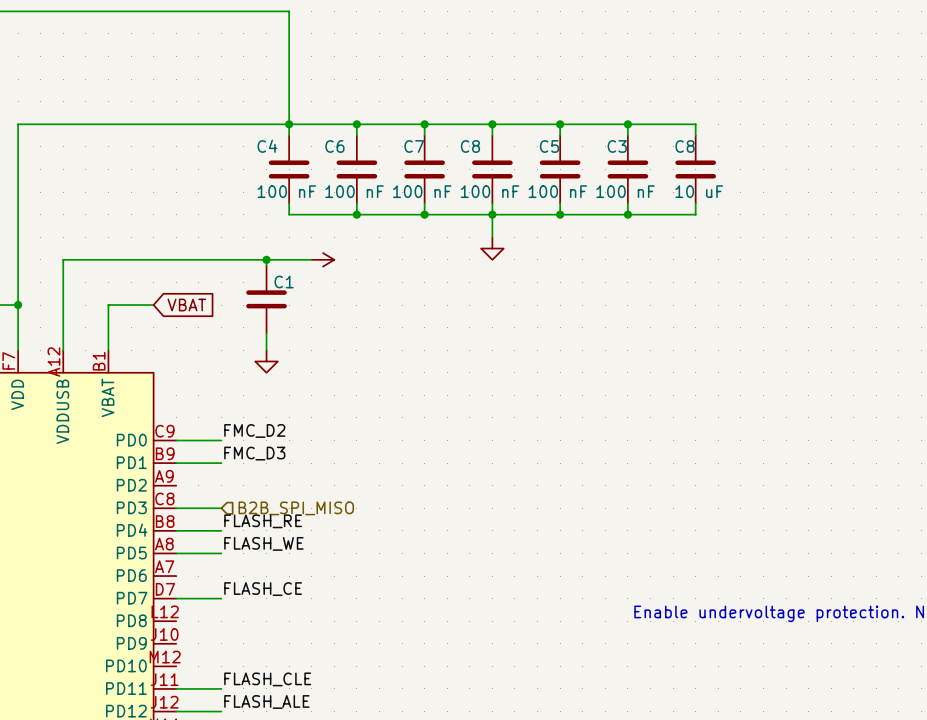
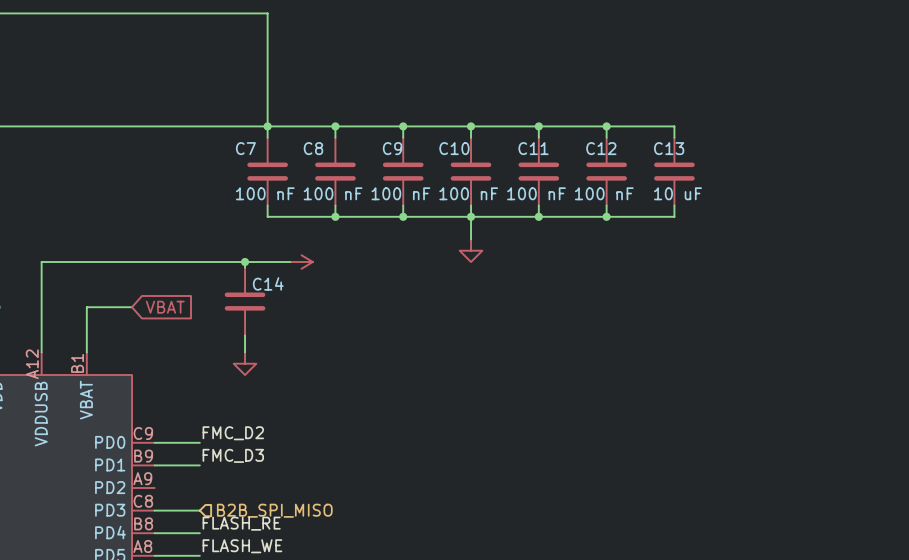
C4 name: C4 (267, 146) -> C7 (245, 148)
C6 name: C6 (334, 146) -> C8 (313, 148)
C7 name: C7 (414, 146) -> C9 (392, 148)
C8 name: C8 (470, 146) -> C10 (454, 148)
C5 name: C5 (549, 146) -> C11 (533, 148)
C3 name: C3 (617, 146) -> C12 (601, 148)
C8 name: C8 (684, 146) -> C13 (669, 148)
C1 name: C1 (284, 281) -> C14 (268, 283)

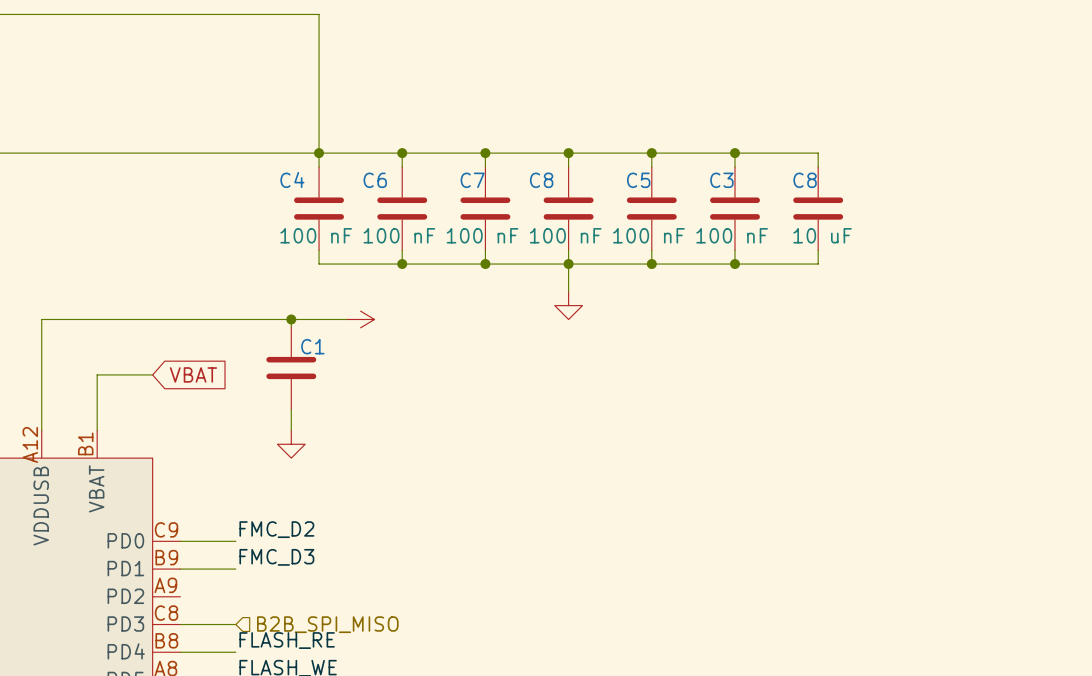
C7 name: C7 (245, 148) -> C4 (292, 179)
C8 name: C8 (313, 148) -> C6 (375, 180)
C9 name: C9 (392, 148) -> C7 (472, 180)
C10 name: C10 (454, 148) -> C8 (541, 180)
C11 name: C11 (533, 148) -> C5 (638, 180)
C12 name: C12 (601, 148) -> C3 (721, 180)
C13 name: C13 (669, 148) -> C8 (805, 180)
C14 name: C14 (268, 283) -> C1 (312, 346)

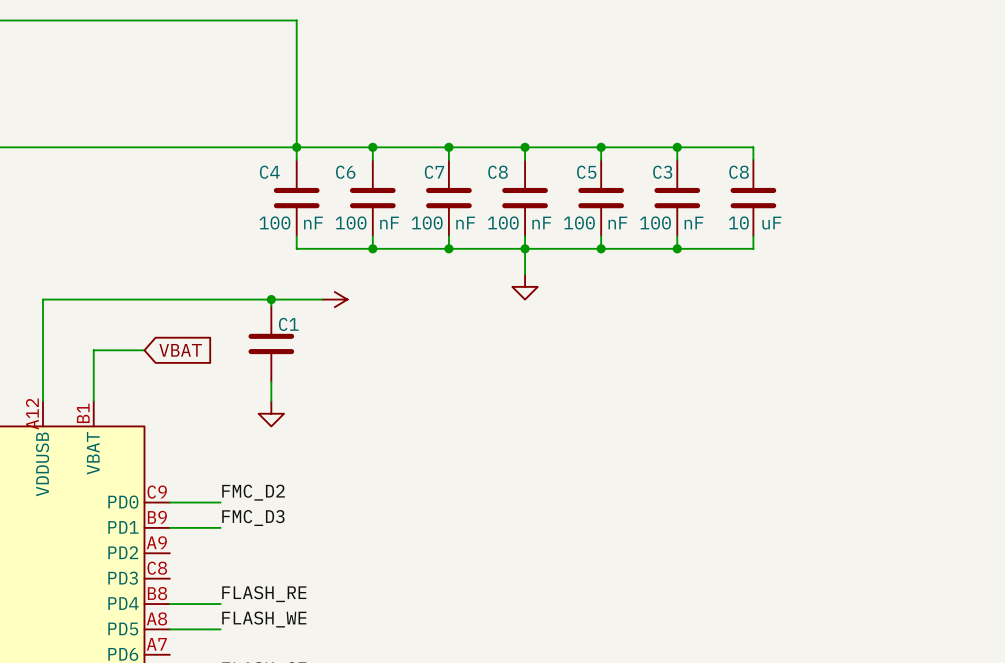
wire: (180, 624) (235, 624) -> none
hierarchical label: B2B_SPI_MISO (327, 624) -> none

